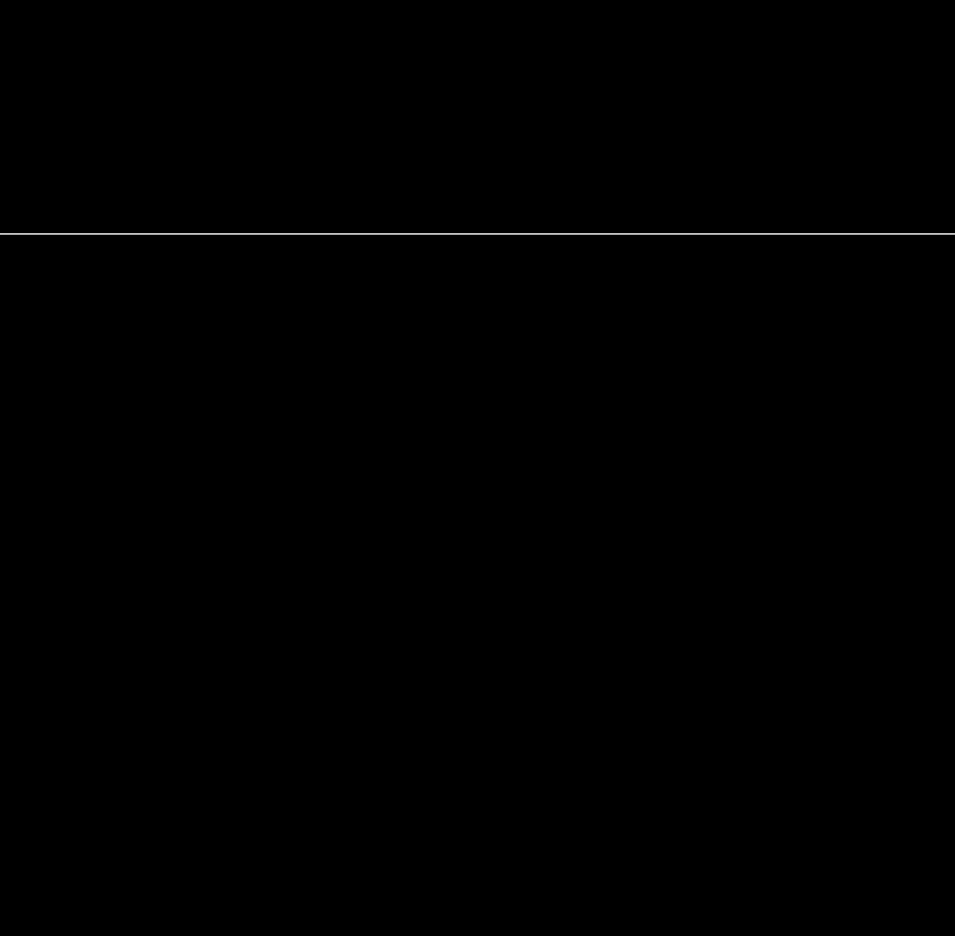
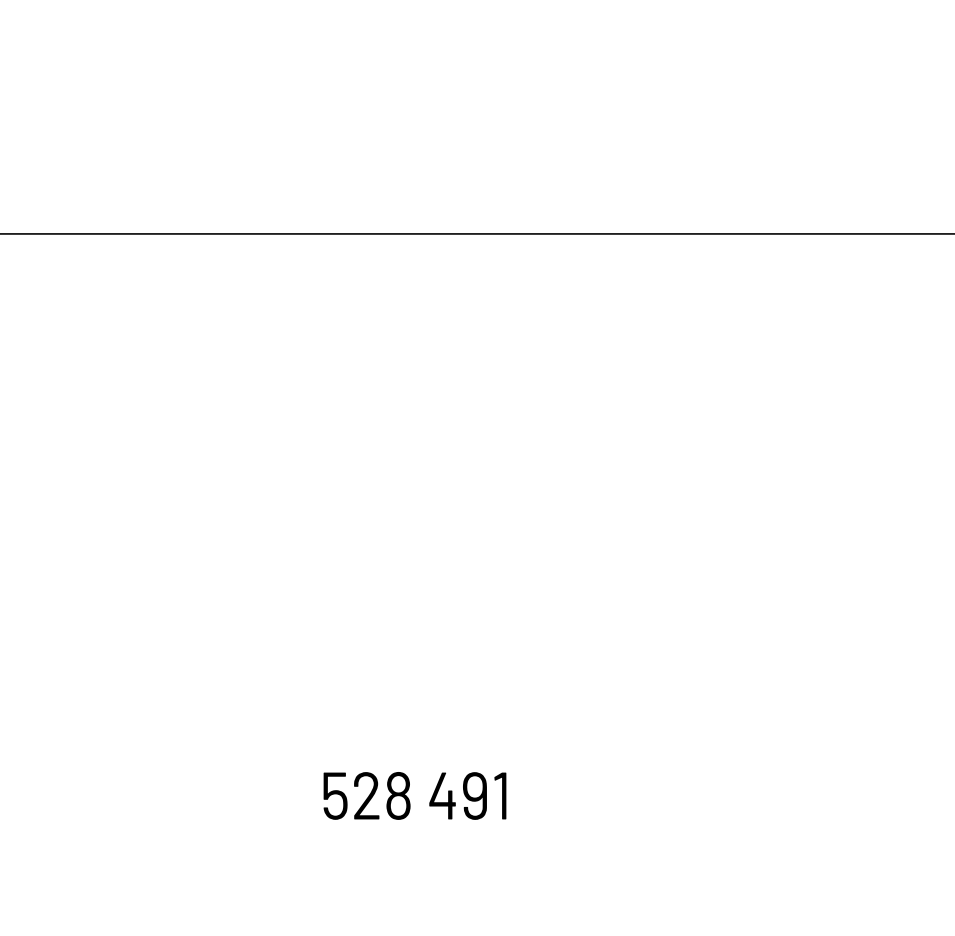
text: none -> 528 491 (415, 795)

